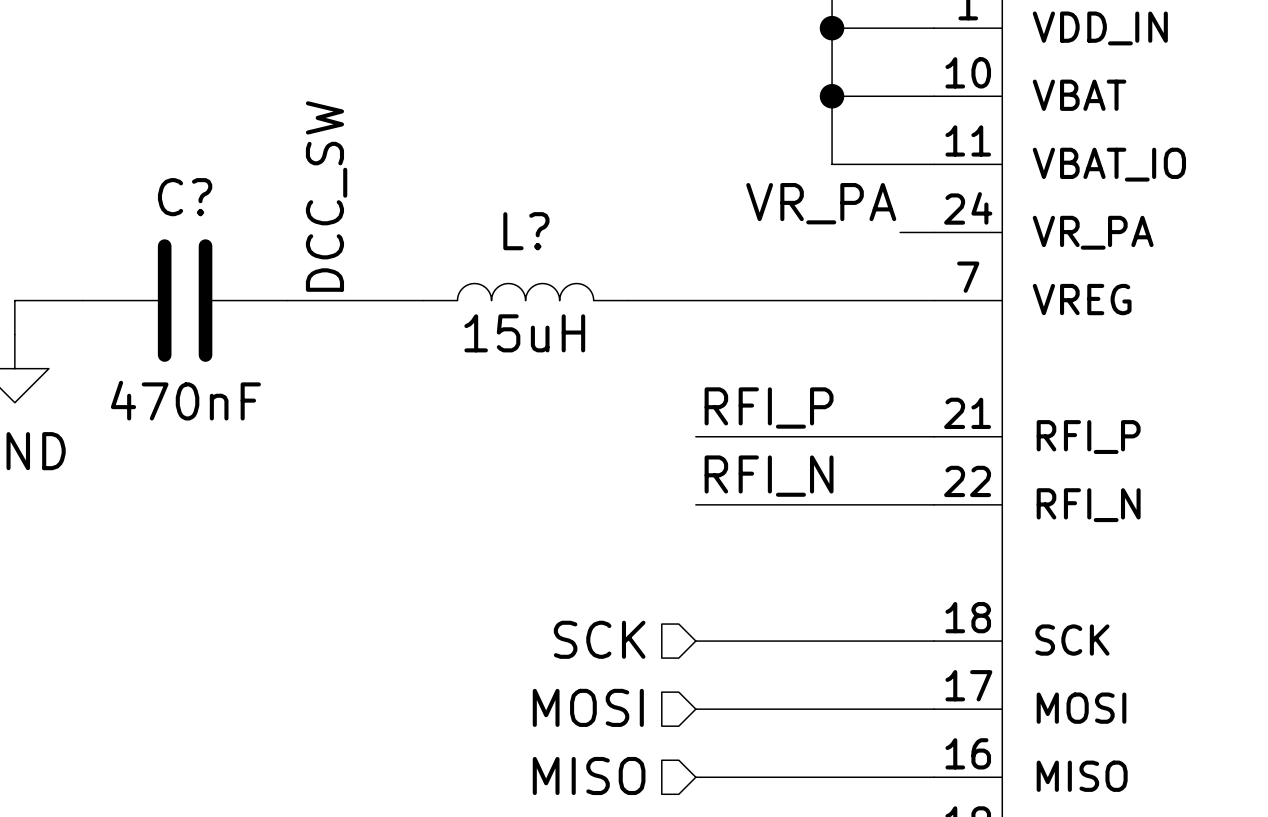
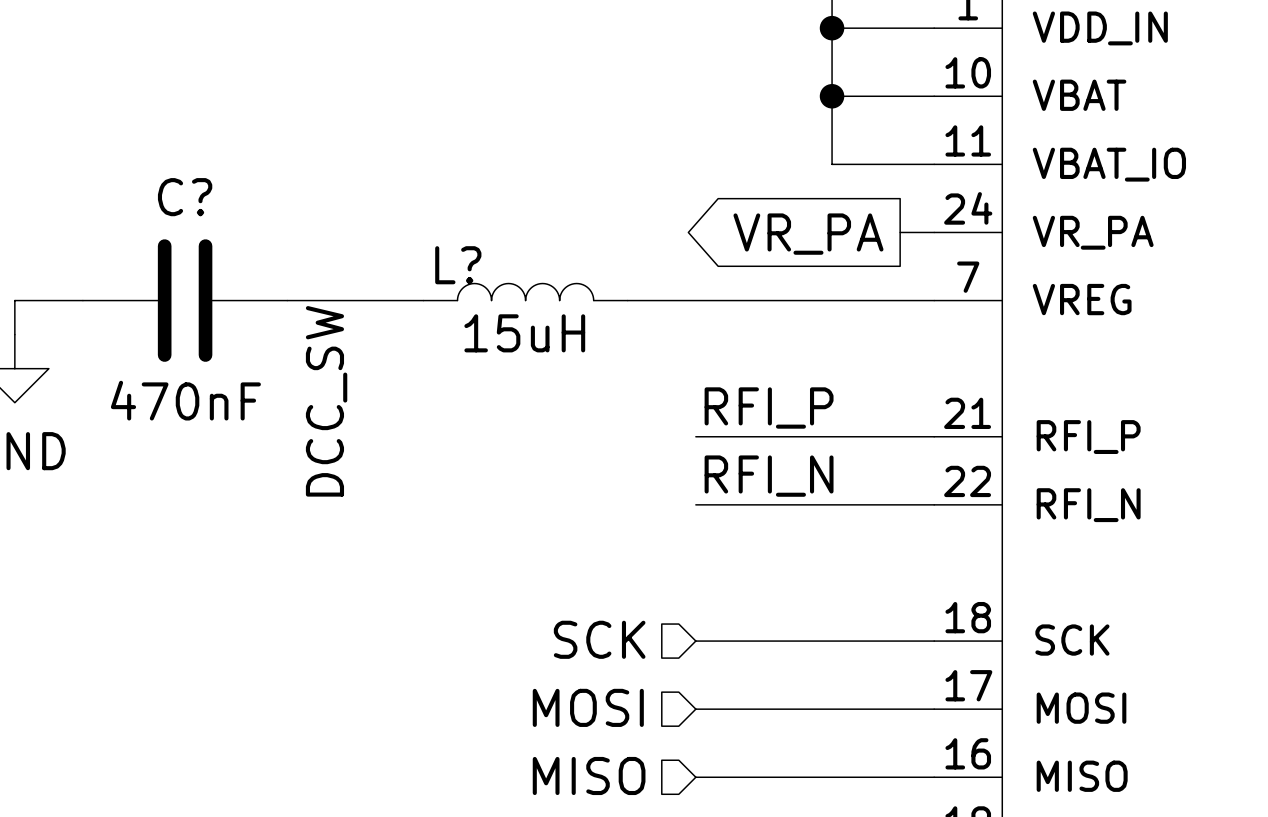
label position: DCC_SW (326, 196) -> DCC_SW (326, 401)
label: VR_PA (821, 203) -> none
L? name position: L? (526, 231) -> L? (458, 265)
global label: none -> VR_PA (808, 234)

